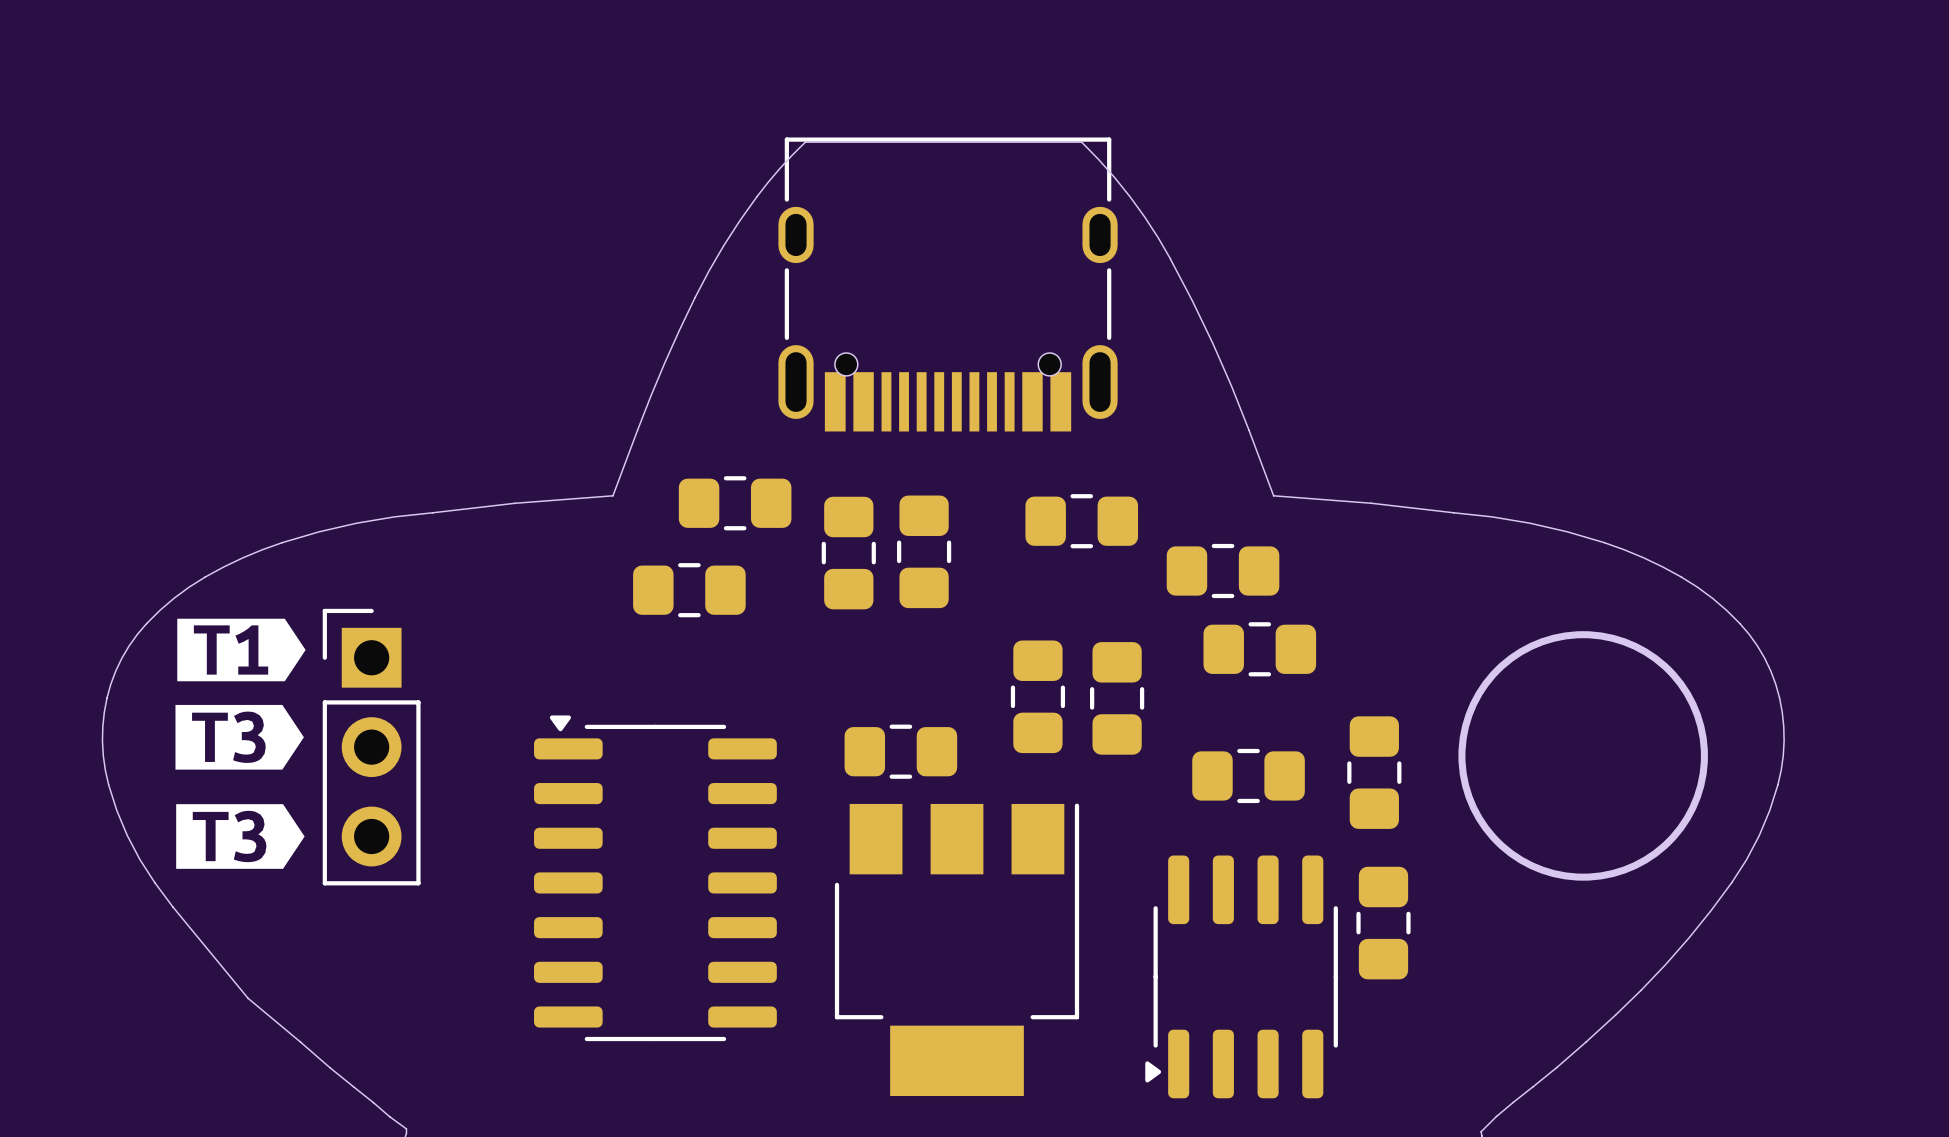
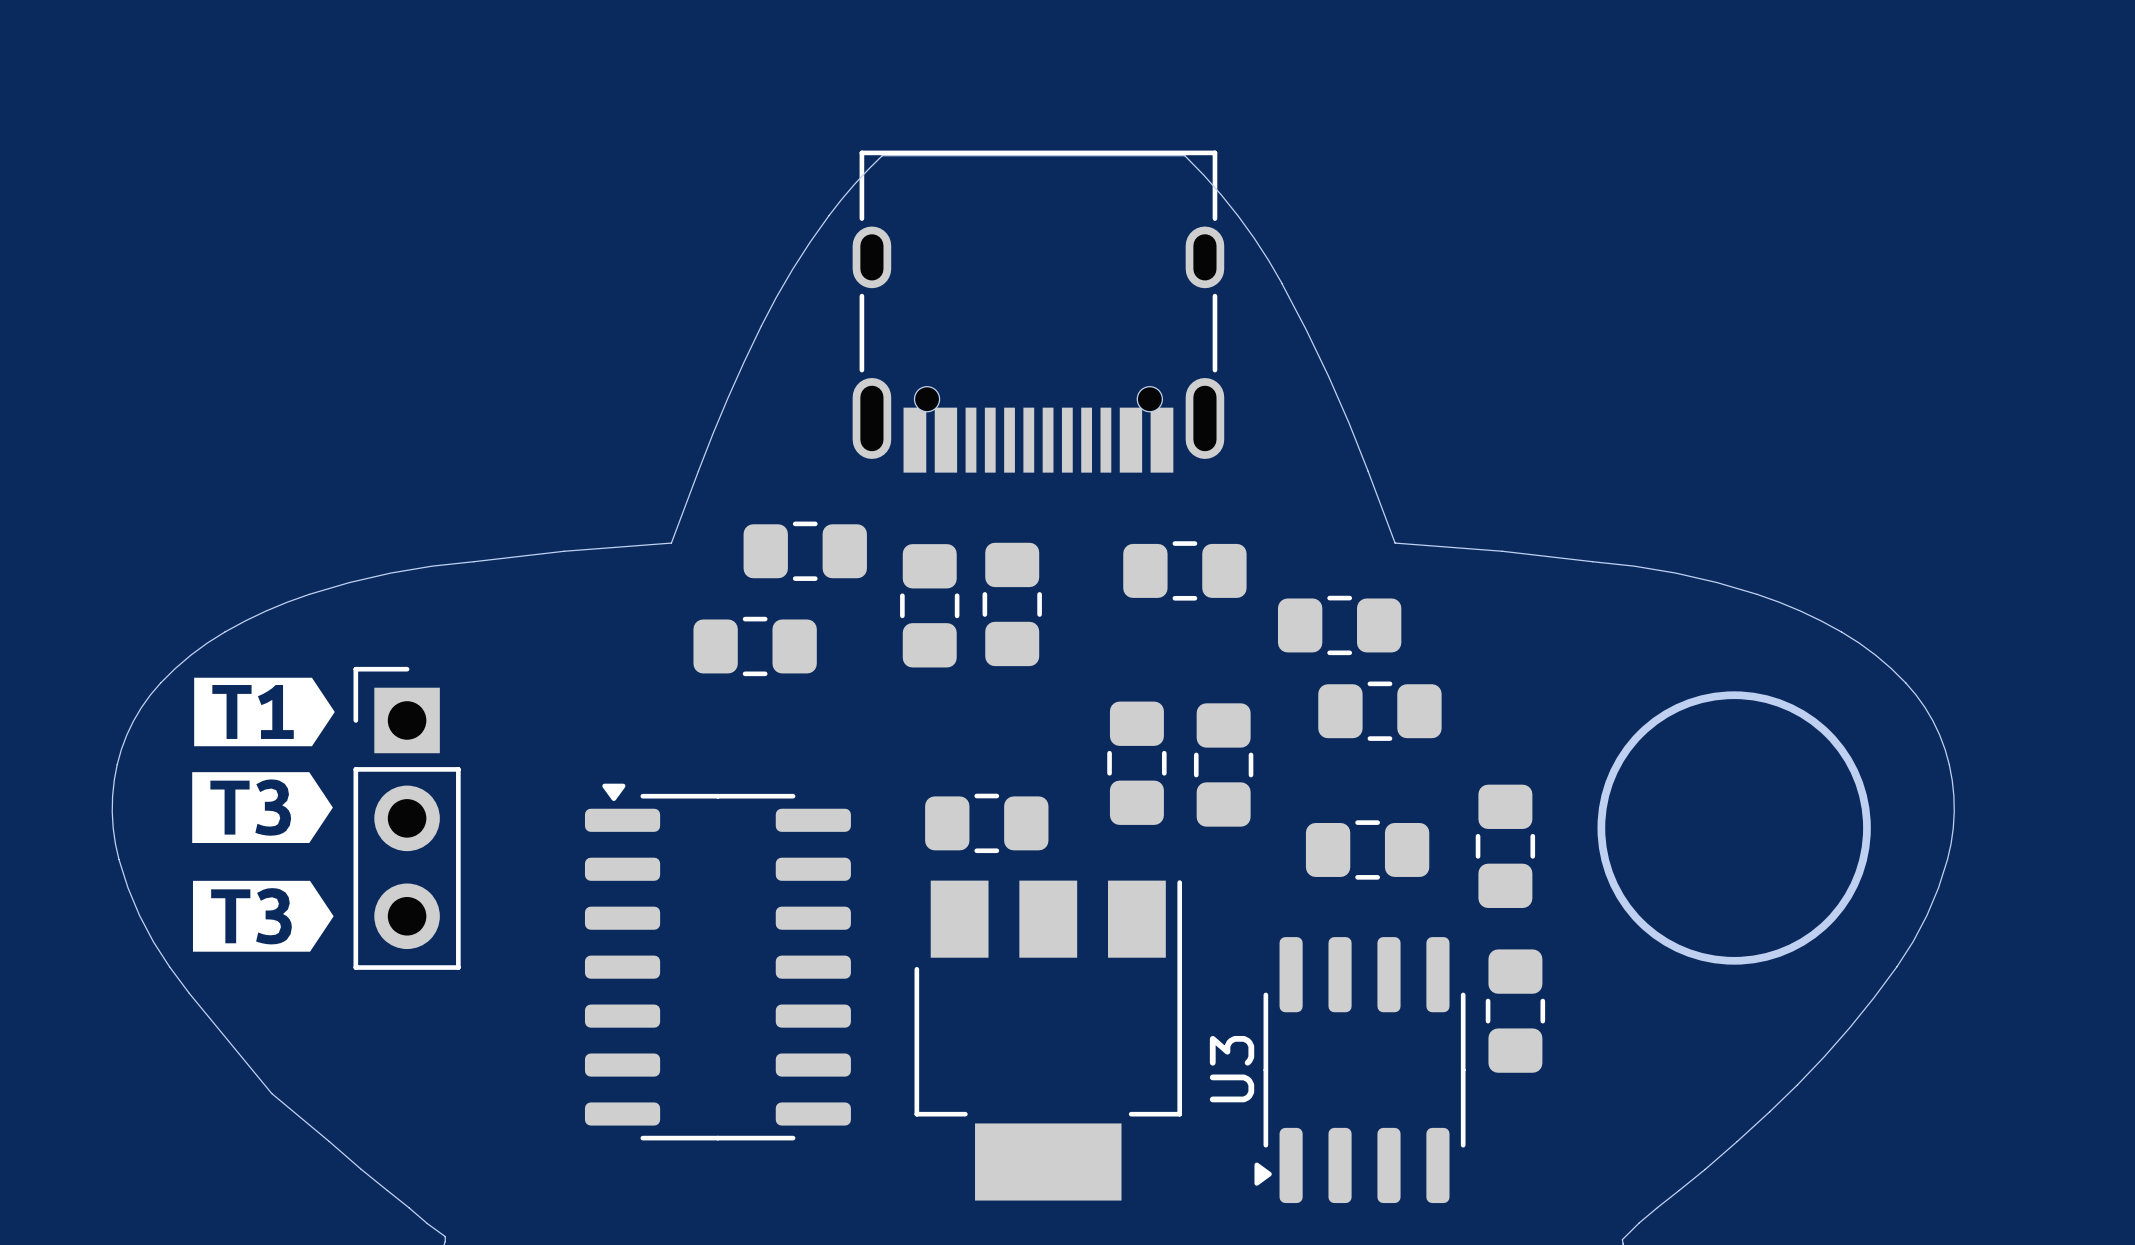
U3 name: none -> U3 (1232, 1069)

